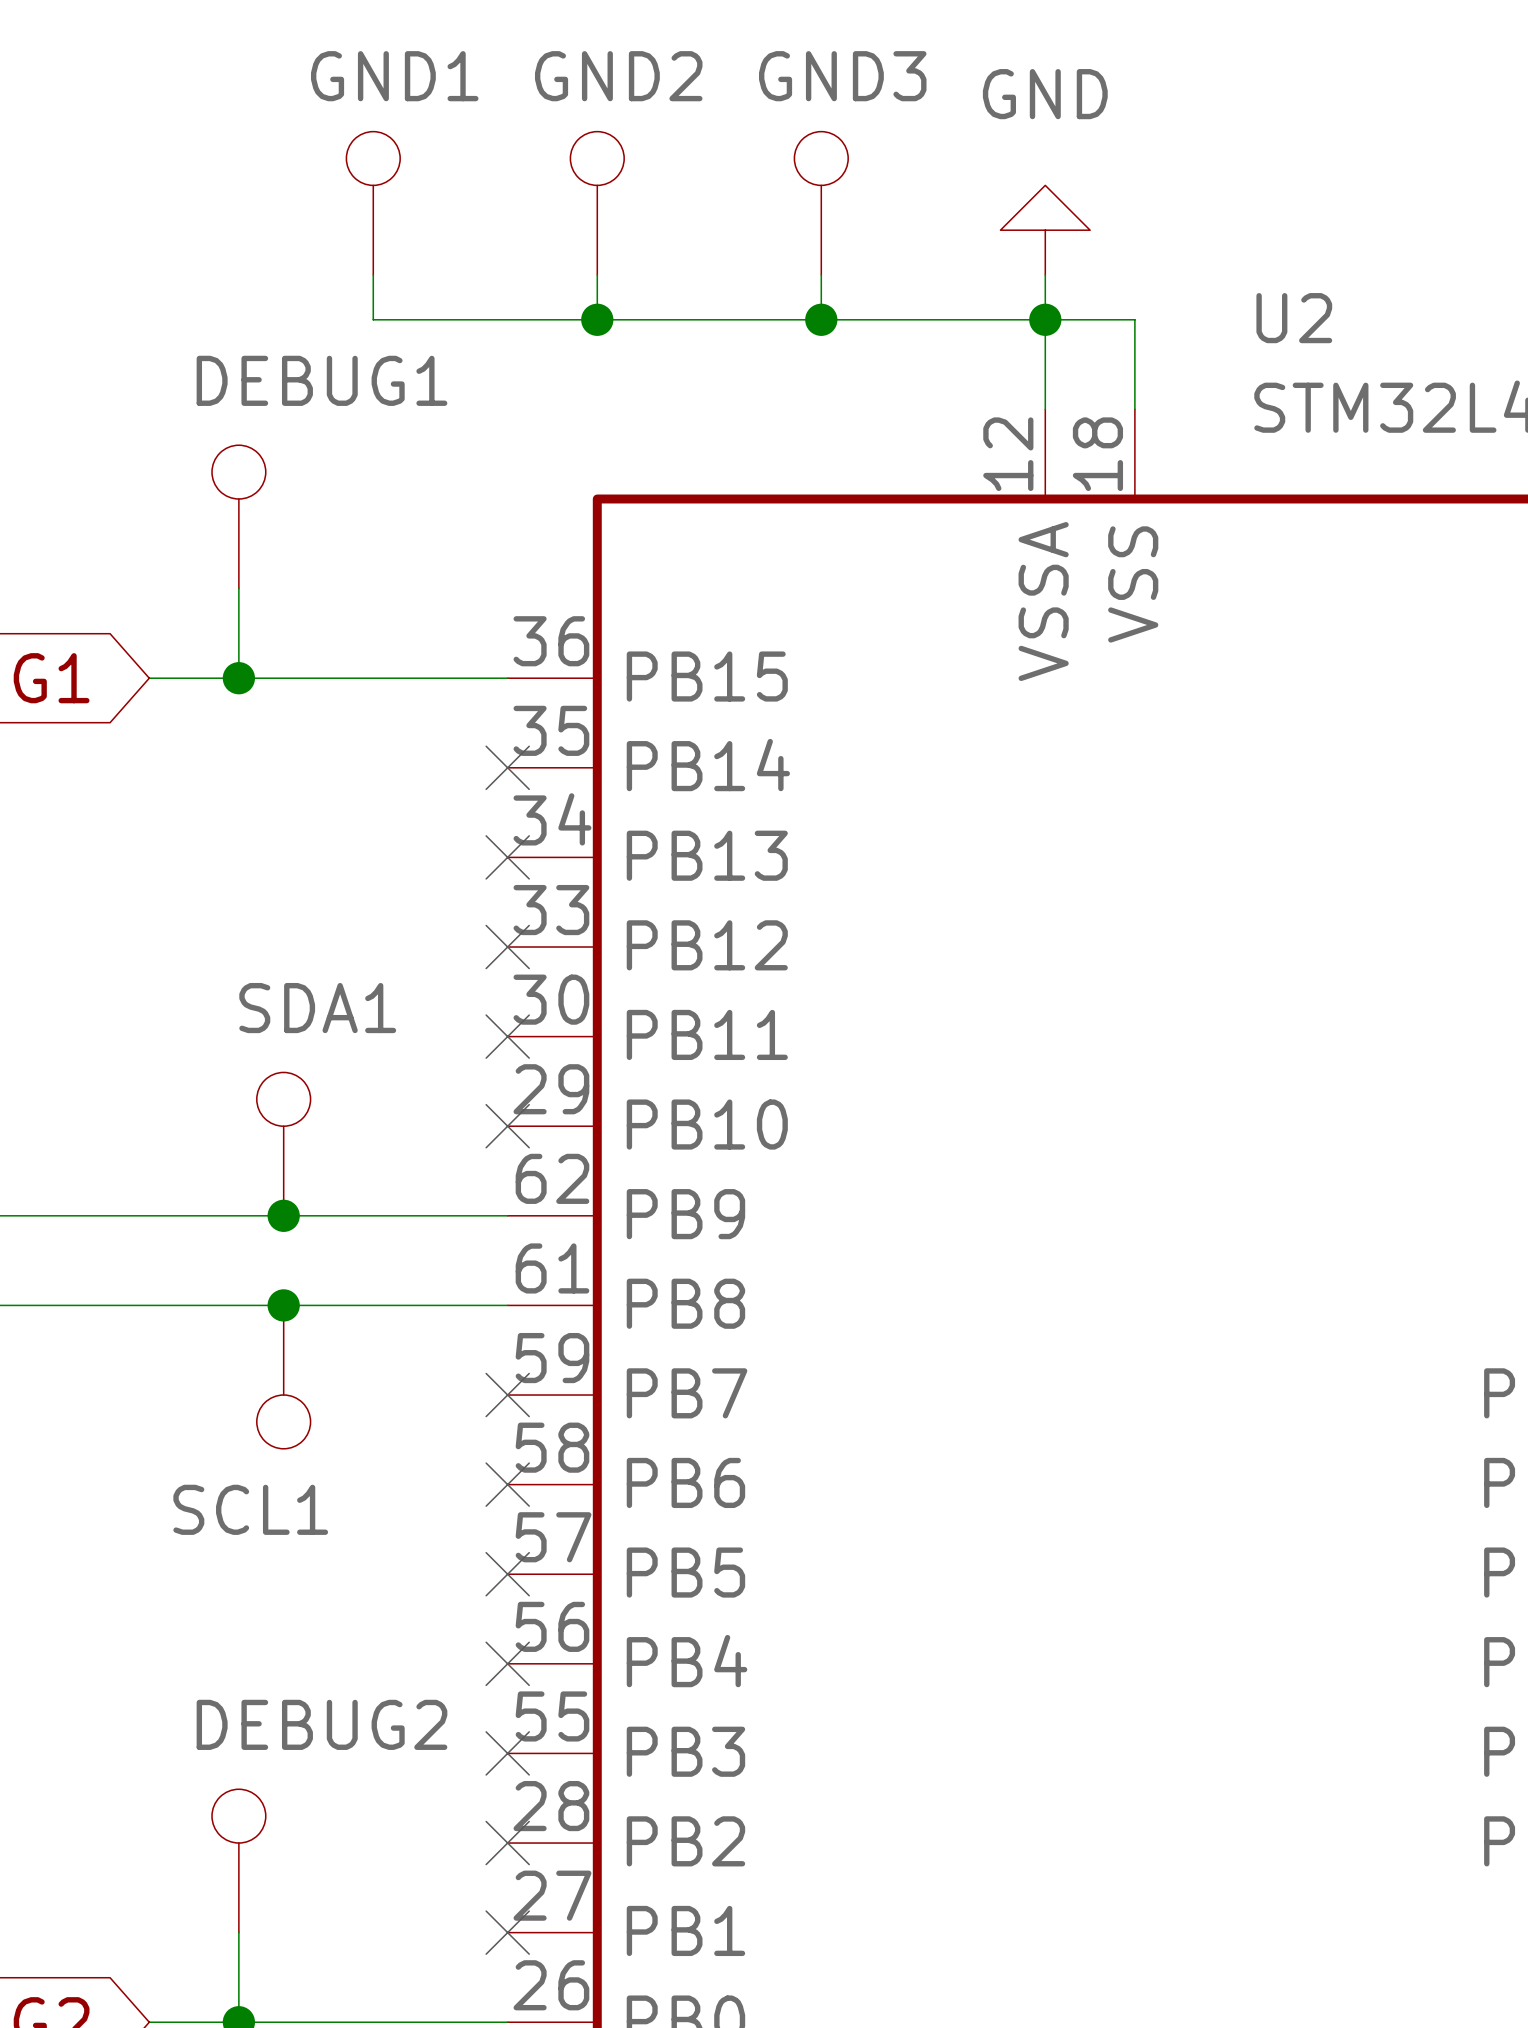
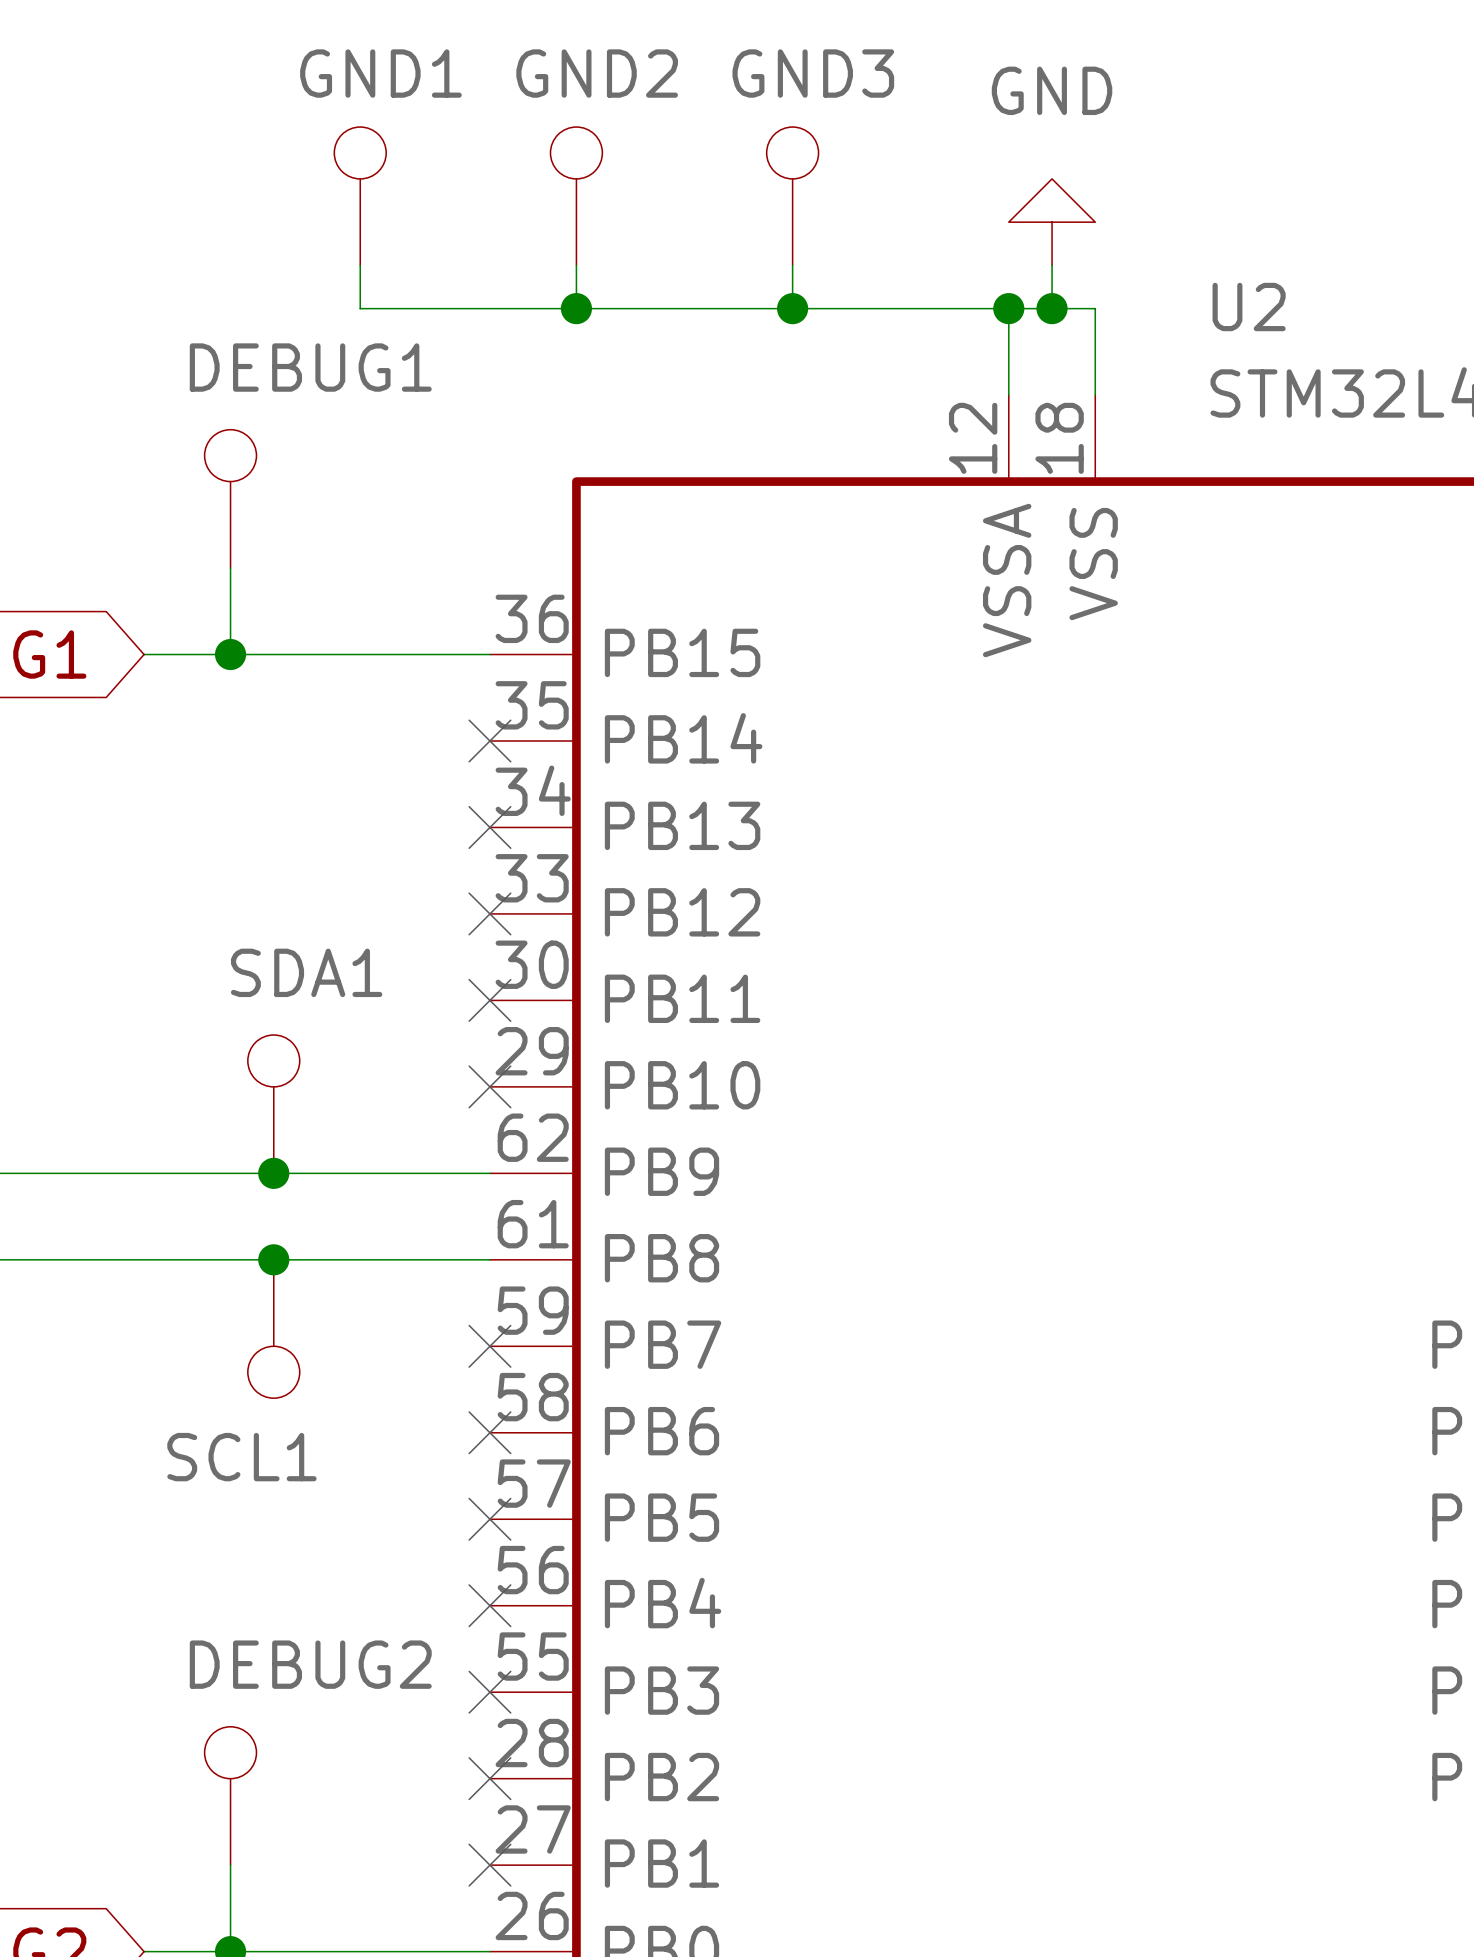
power symbol position: GND (1045, 230) -> GND (1052, 222)
wire: (1045, 274) (1045, 319) -> (1052, 265) (1052, 308)
junction: none -> (1052, 308)

